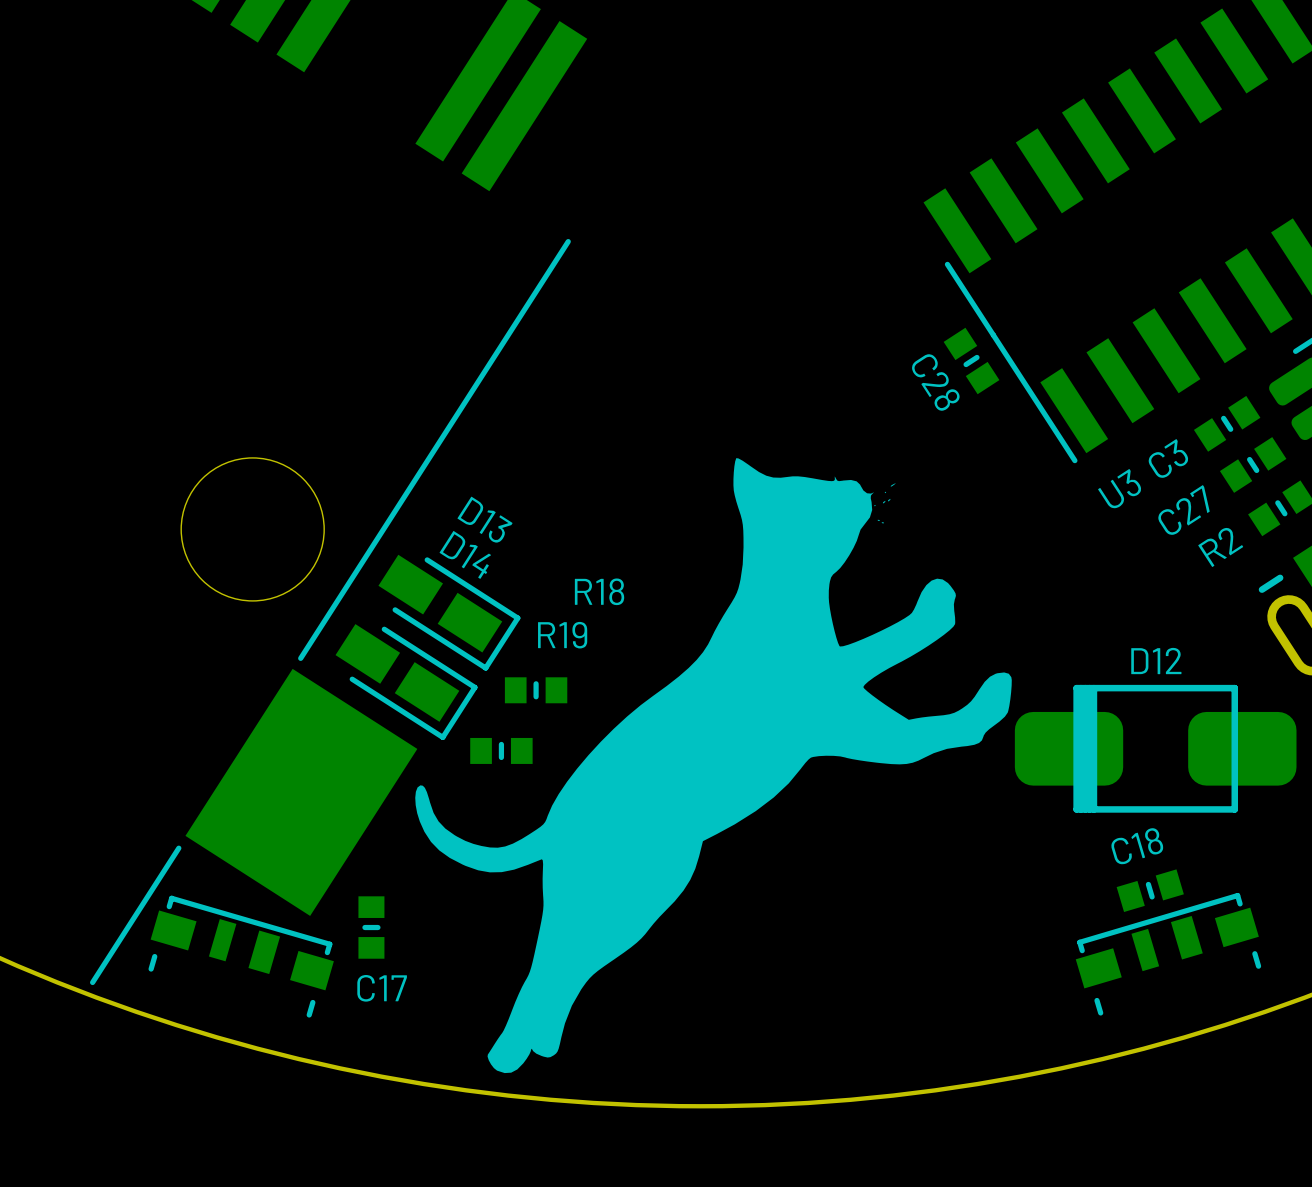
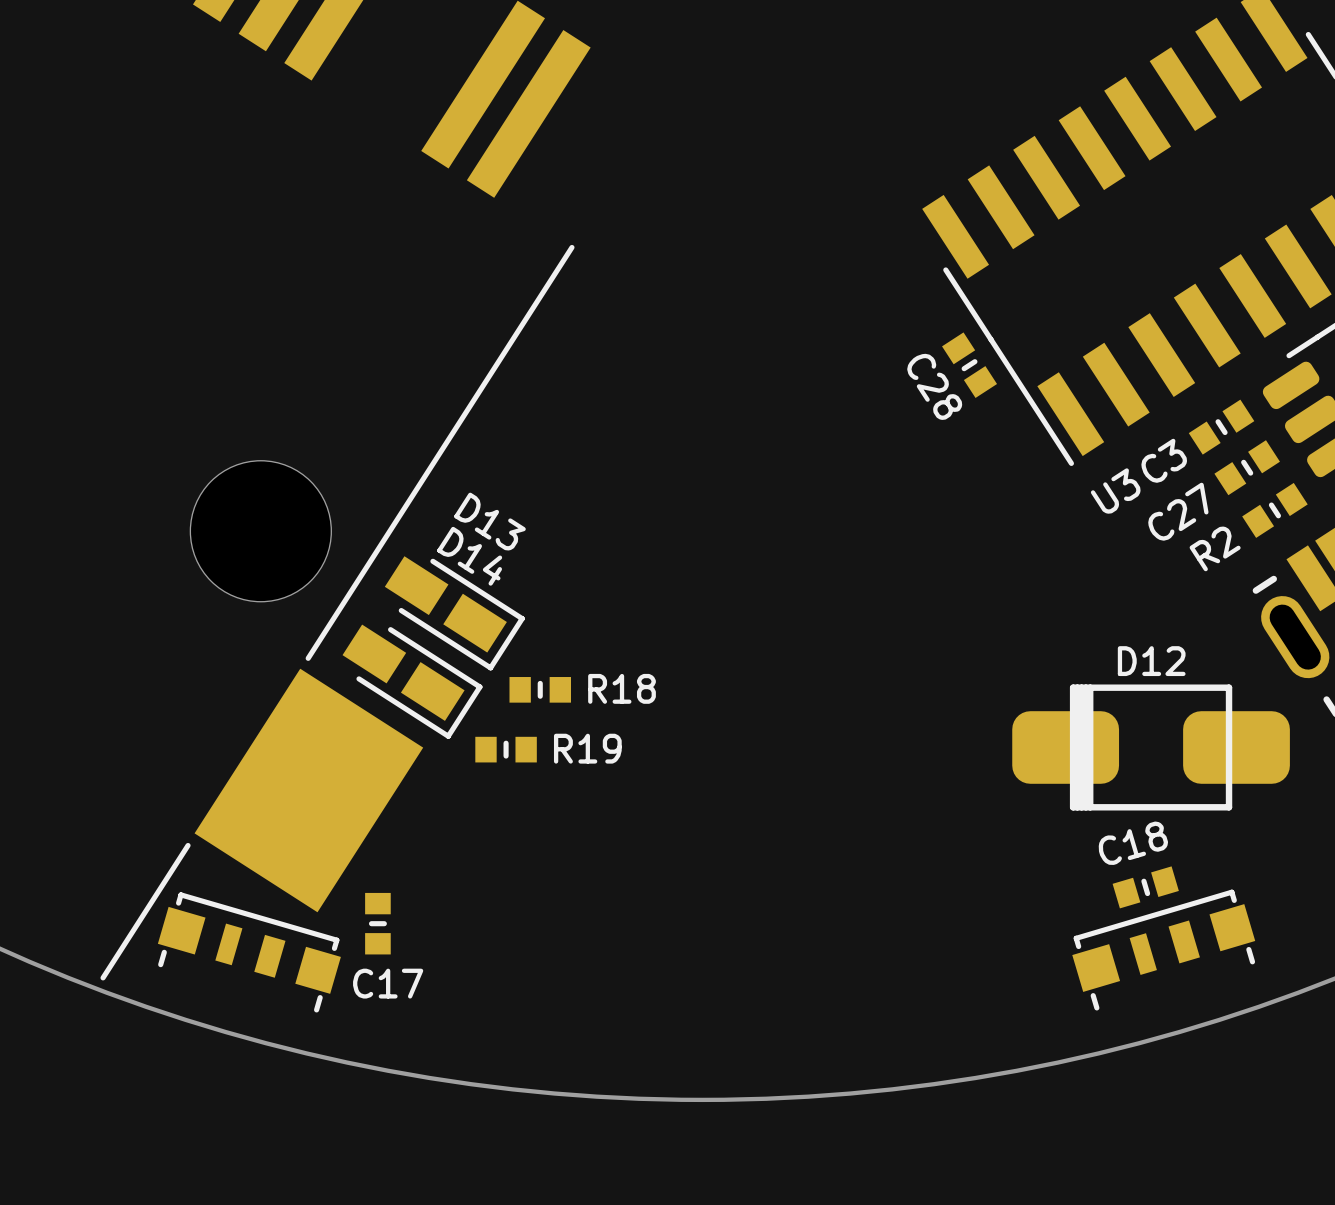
drawing: [415, 458, 1012, 1074] -> none
R18 name position: R18 (599, 591) -> R18 (622, 688)
R19 name position: R19 (562, 635) -> R19 (587, 748)
part footprint: [1075, 892, 1262, 1016] -> [1072, 889, 1256, 1011]
part footprint: [148, 895, 334, 1018] -> [157, 892, 341, 1013]

